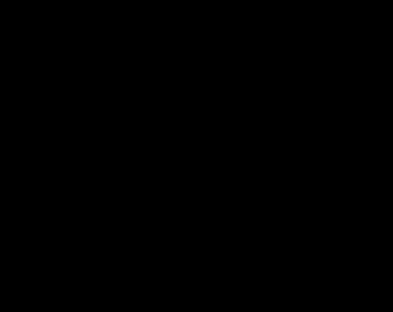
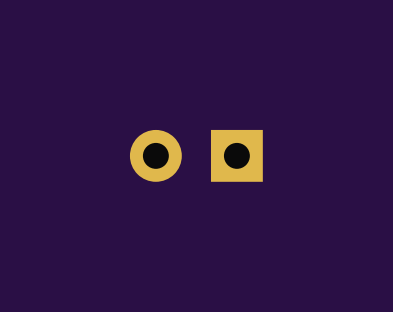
part: none -> (196, 155)

